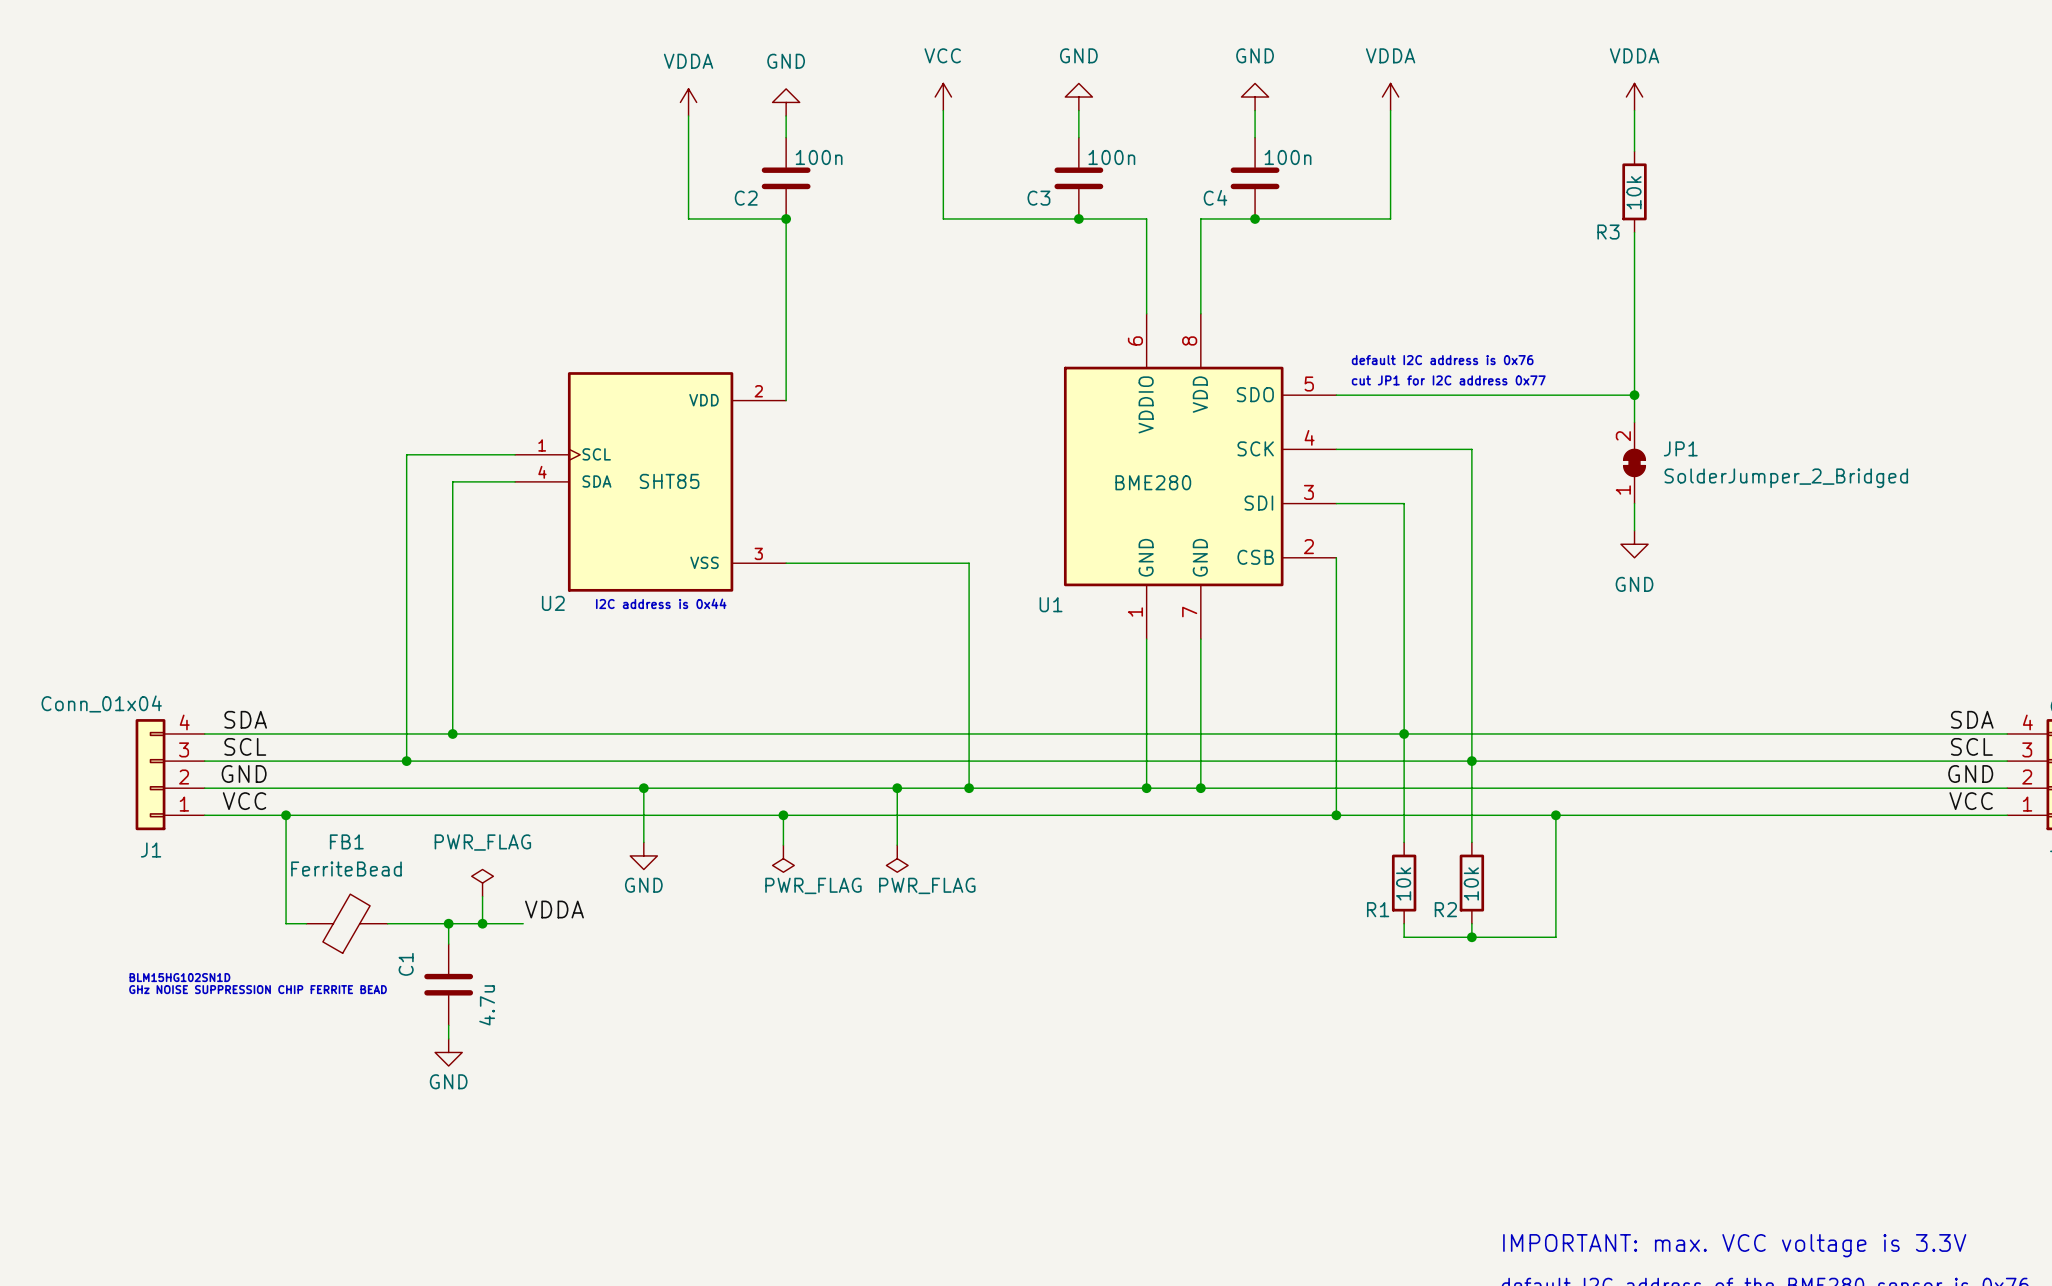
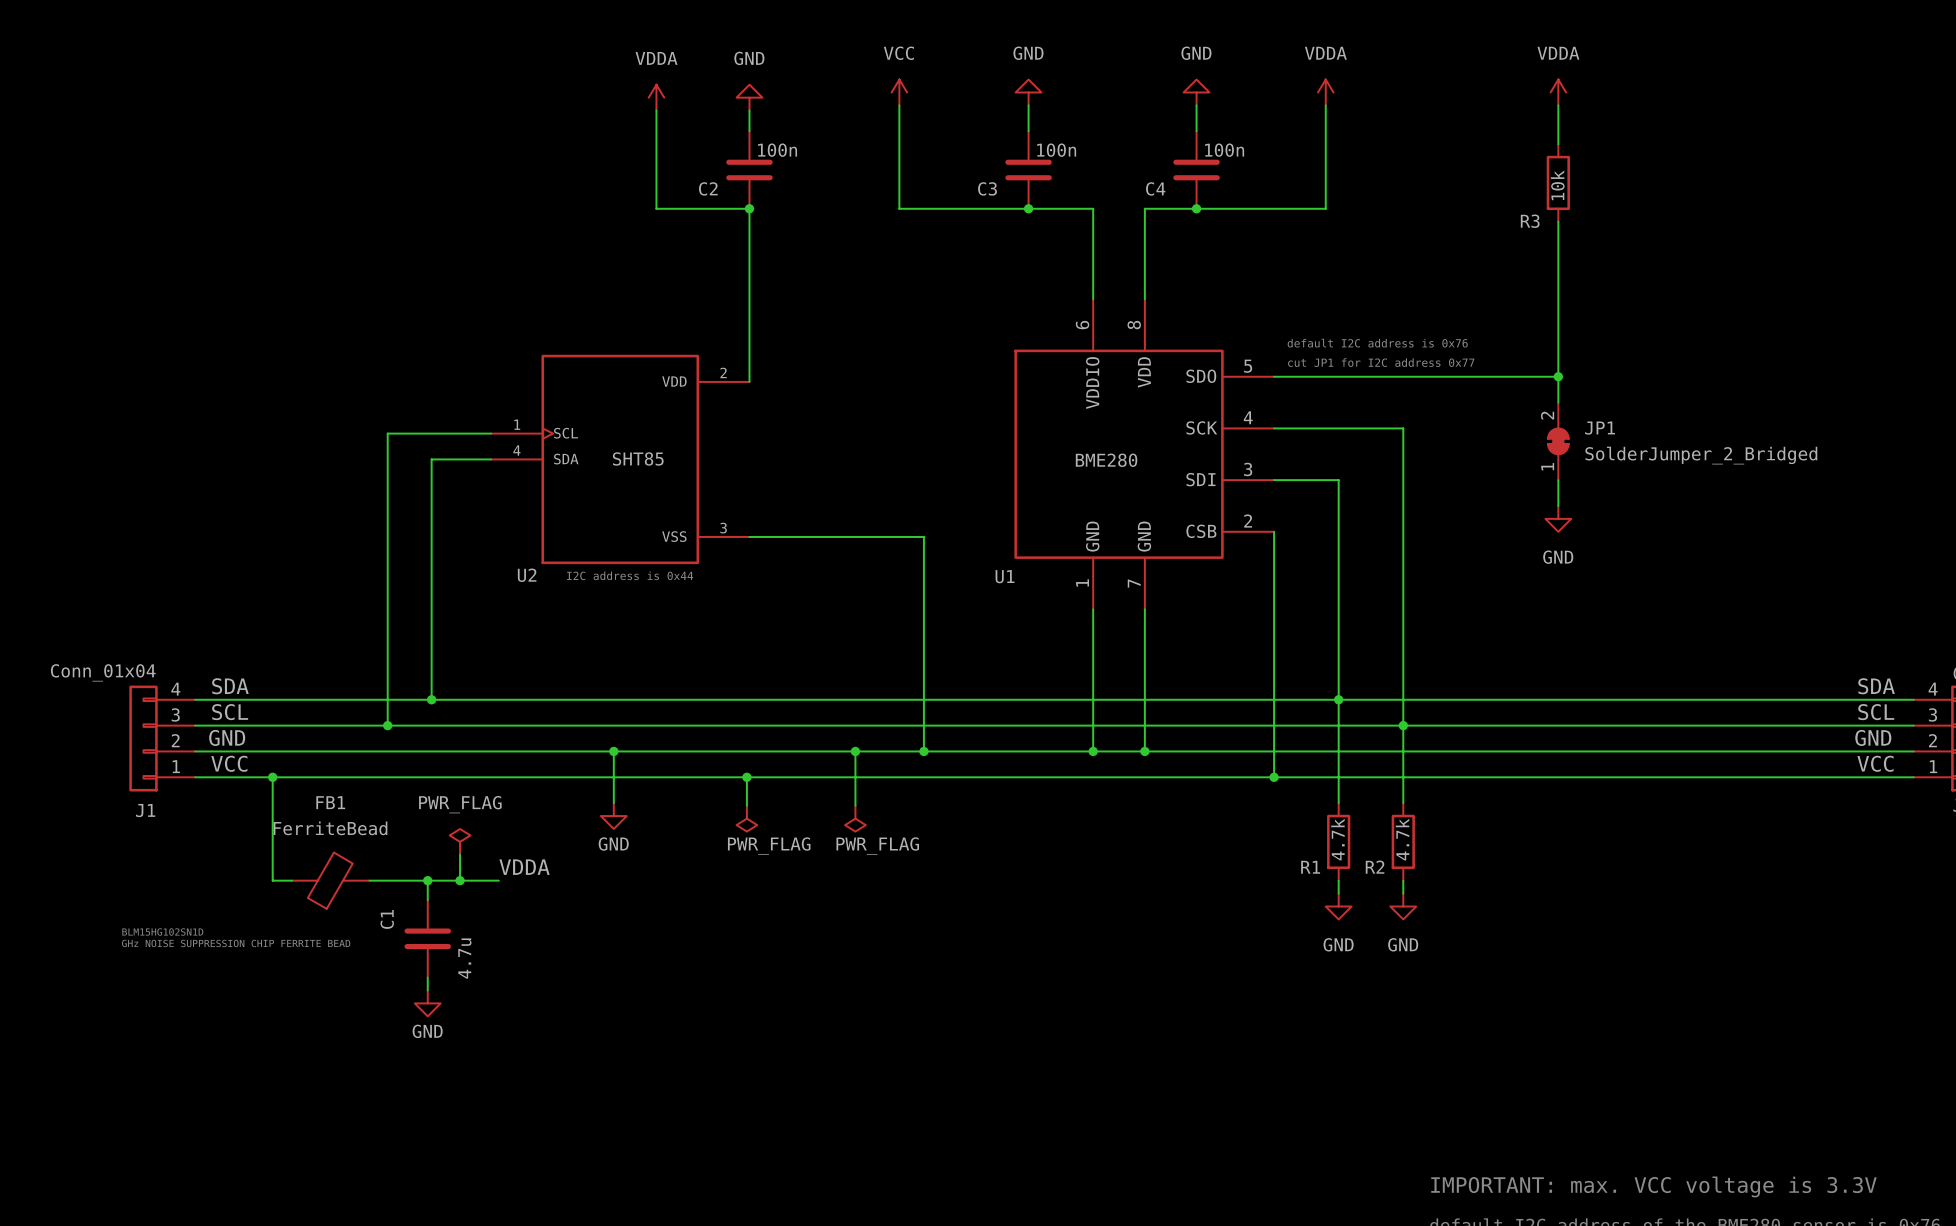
wire: (1555, 815) (1555, 937) (1404, 937) -> none
junction: (1555, 815) -> none
R1 value: 10k (1403, 883) -> 4.7k (1337, 839)
R2 value: 10k (1471, 883) -> 4.7k (1402, 839)
junction: (1471, 937) -> none
power symbol: none -> GND (1338, 906)
power symbol: none -> GND (1403, 906)

